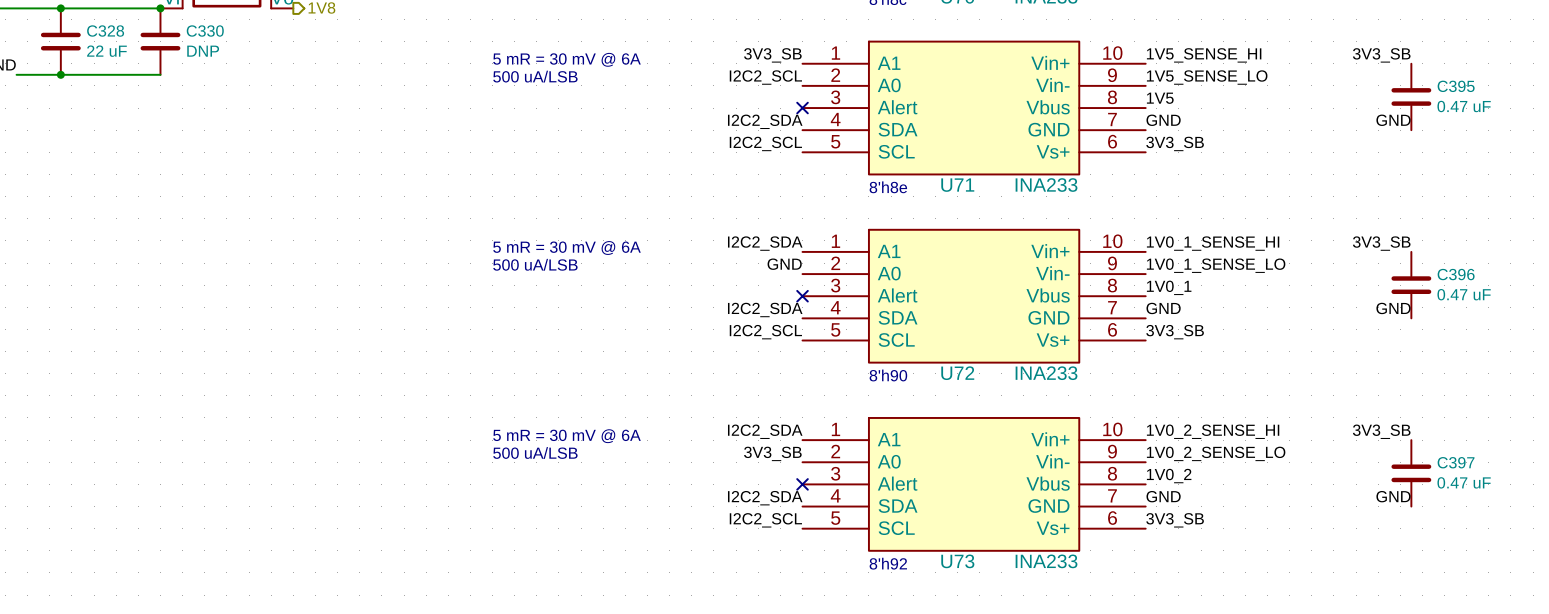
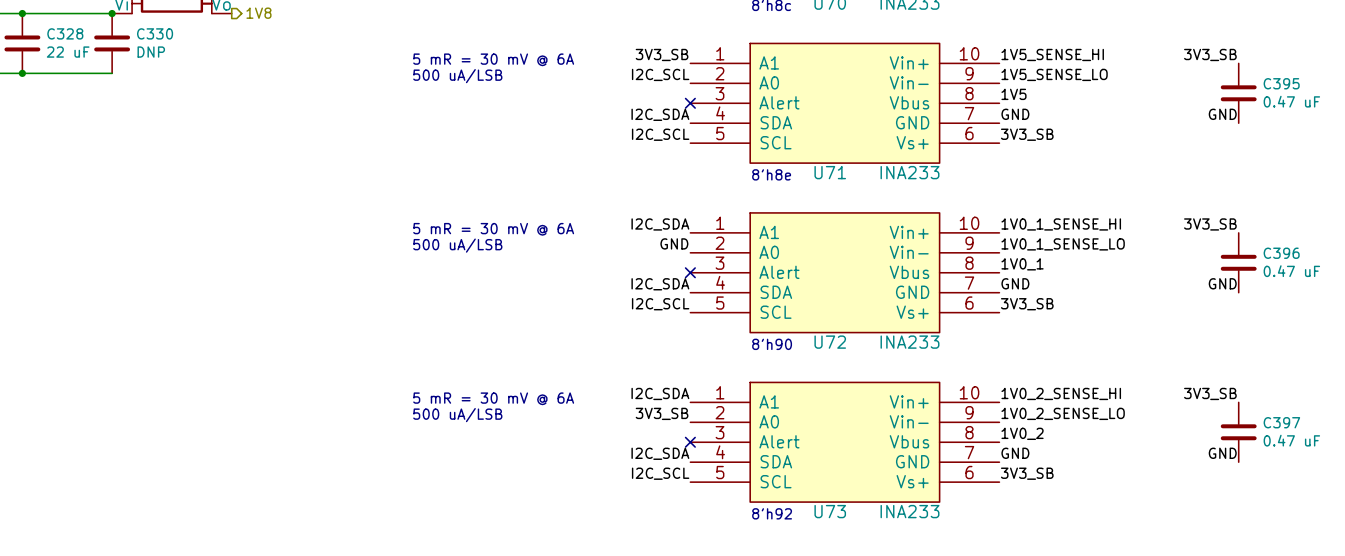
label: I2C2_SCL (765, 77) -> I2C_SCL (660, 74)
label: I2C2_SDA (765, 121) -> I2C_SDA (660, 114)
label: I2C2_SCL (765, 143) -> I2C_SCL (660, 134)
label: I2C2_SDA (765, 243) -> I2C_SDA (660, 224)
label: I2C2_SDA (765, 309) -> I2C_SDA (660, 284)
label: I2C2_SCL (765, 332) -> I2C_SCL (660, 304)
label: I2C2_SDA (765, 431) -> I2C_SDA (660, 393)
label: I2C2_SDA (765, 498) -> I2C_SDA (660, 453)
label: I2C2_SCL (765, 520) -> I2C_SCL (660, 473)

